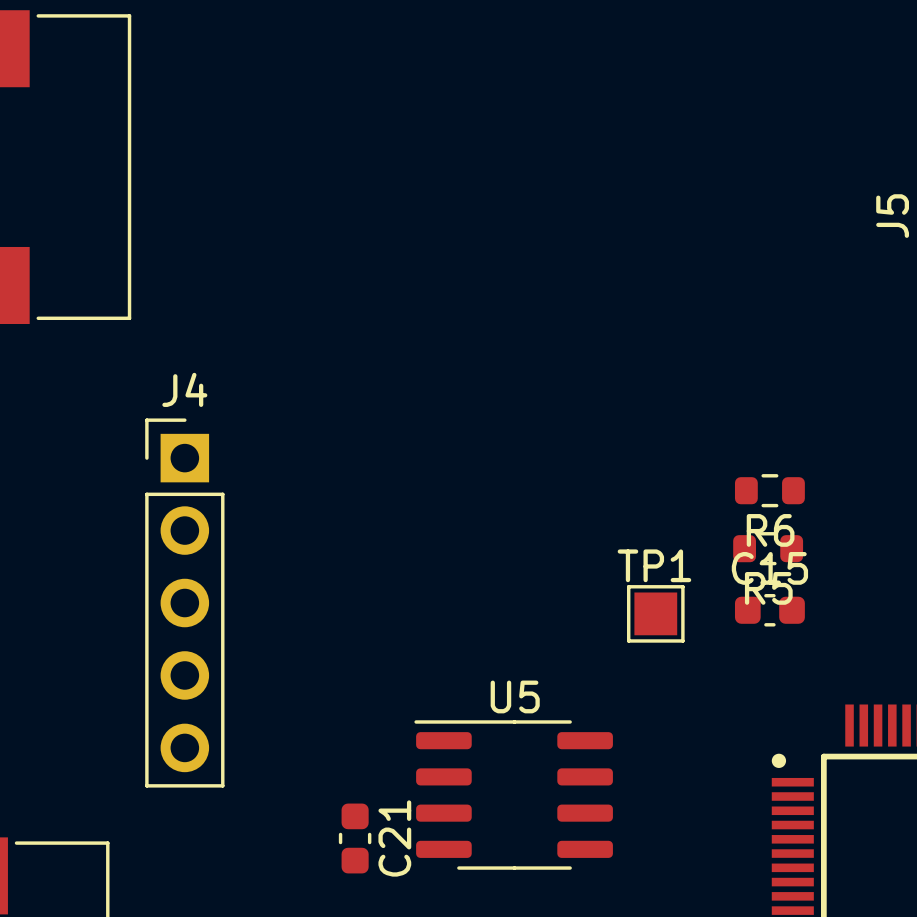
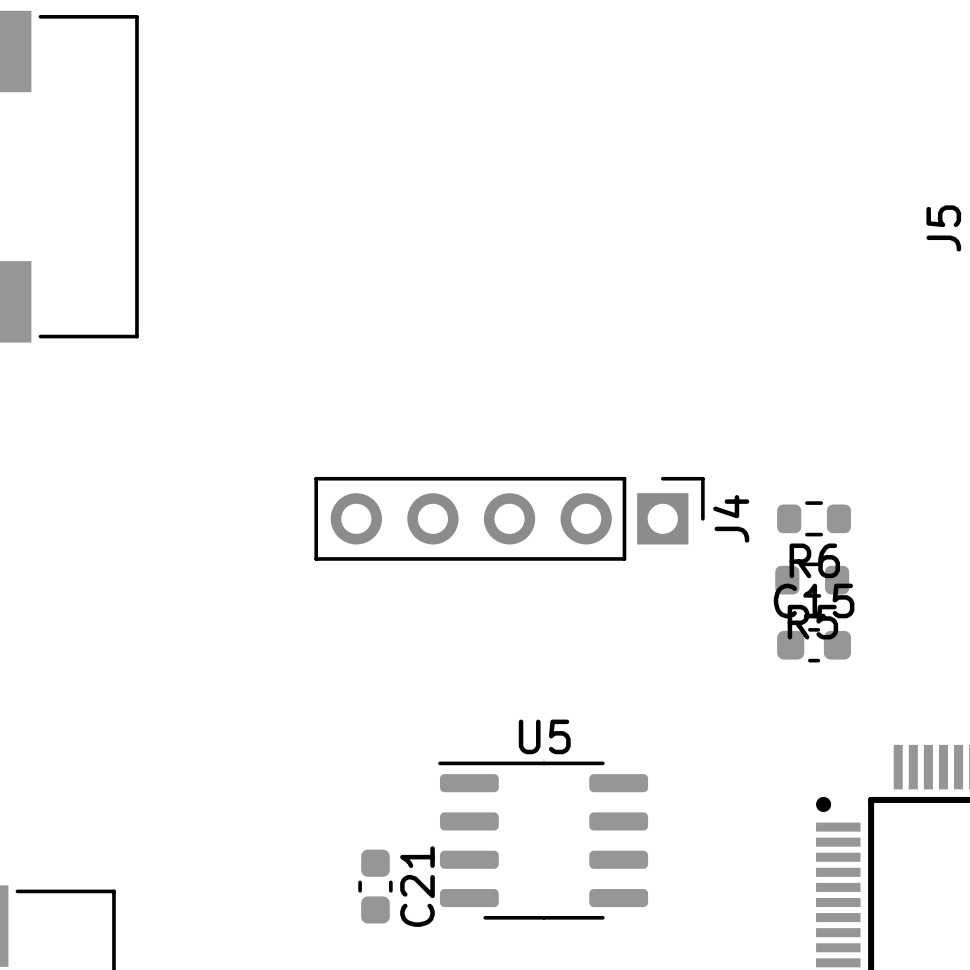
J4 rotation: 0° (184, 603) -> 90° clockwise (509, 518)
J4 position: (184, 603) -> (509, 518)
TP1: (655, 613) -> none

